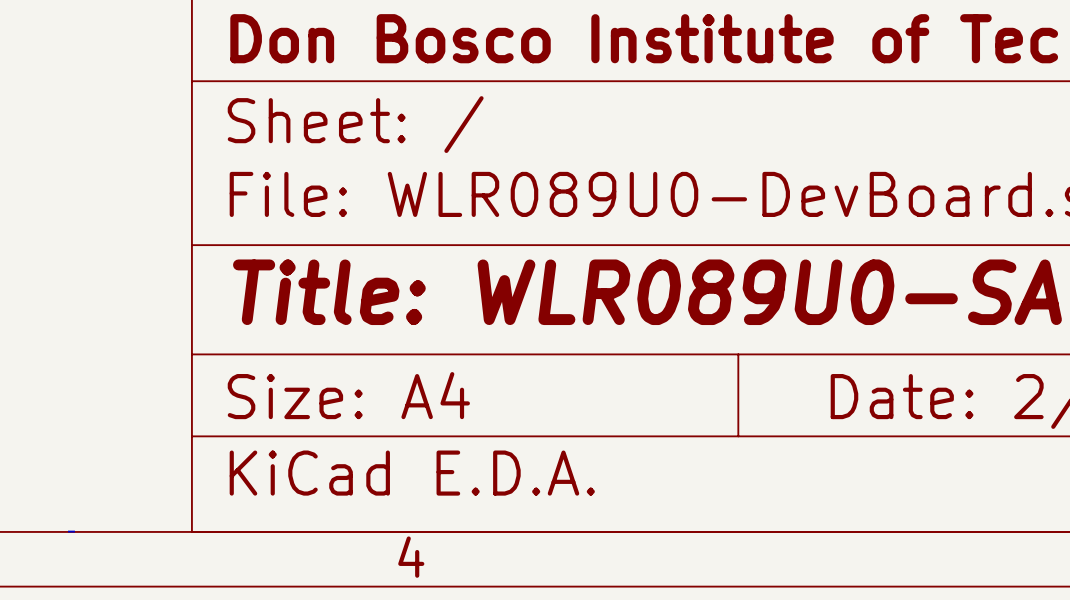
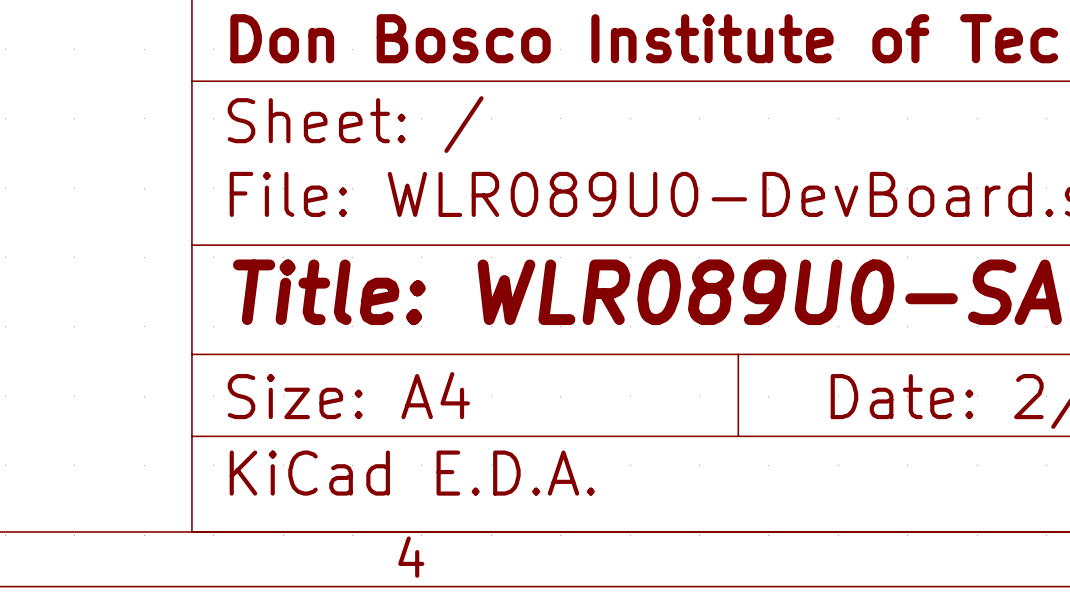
line: (68, 531) (74, 531) -> none

